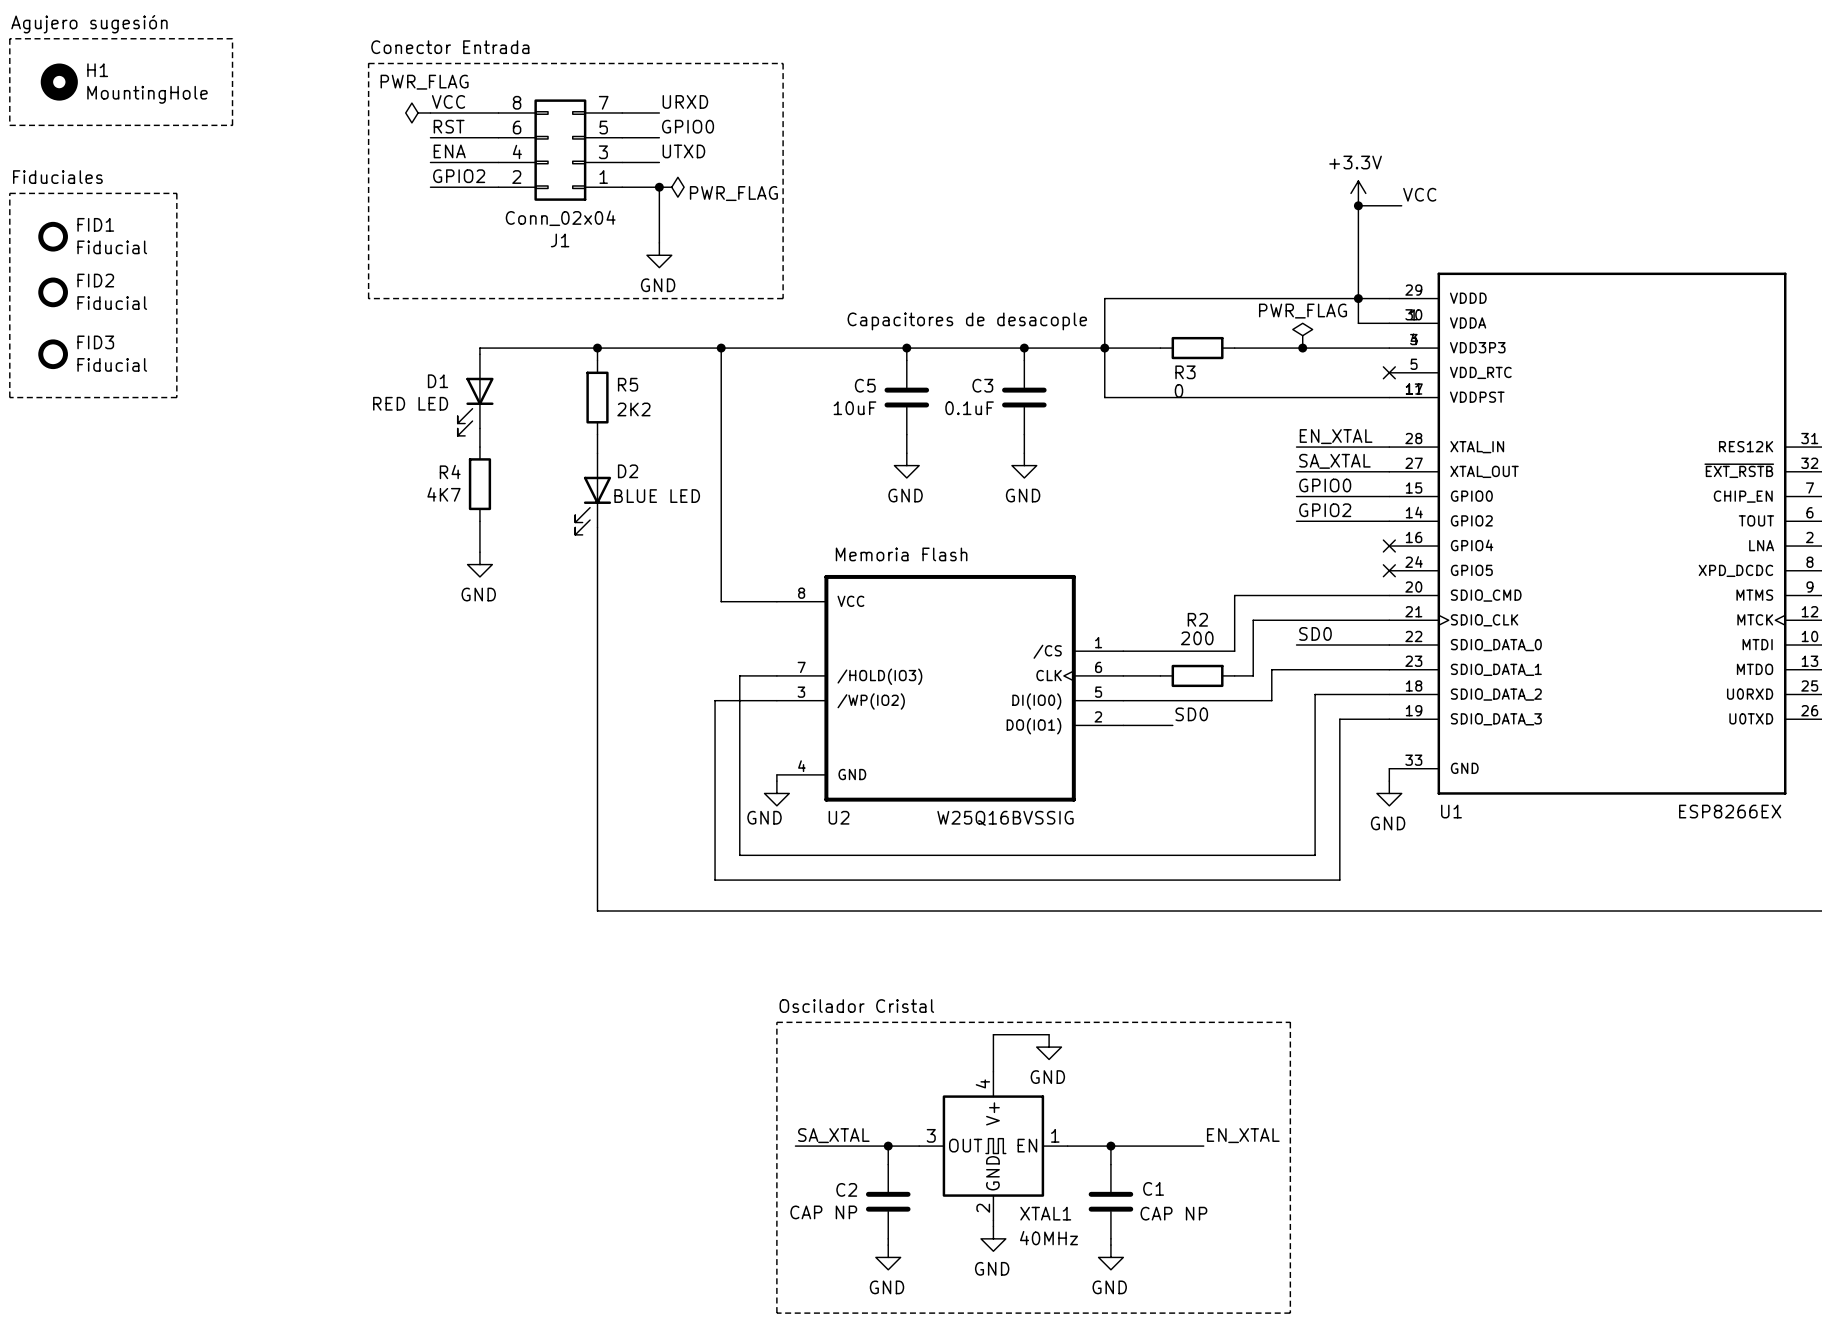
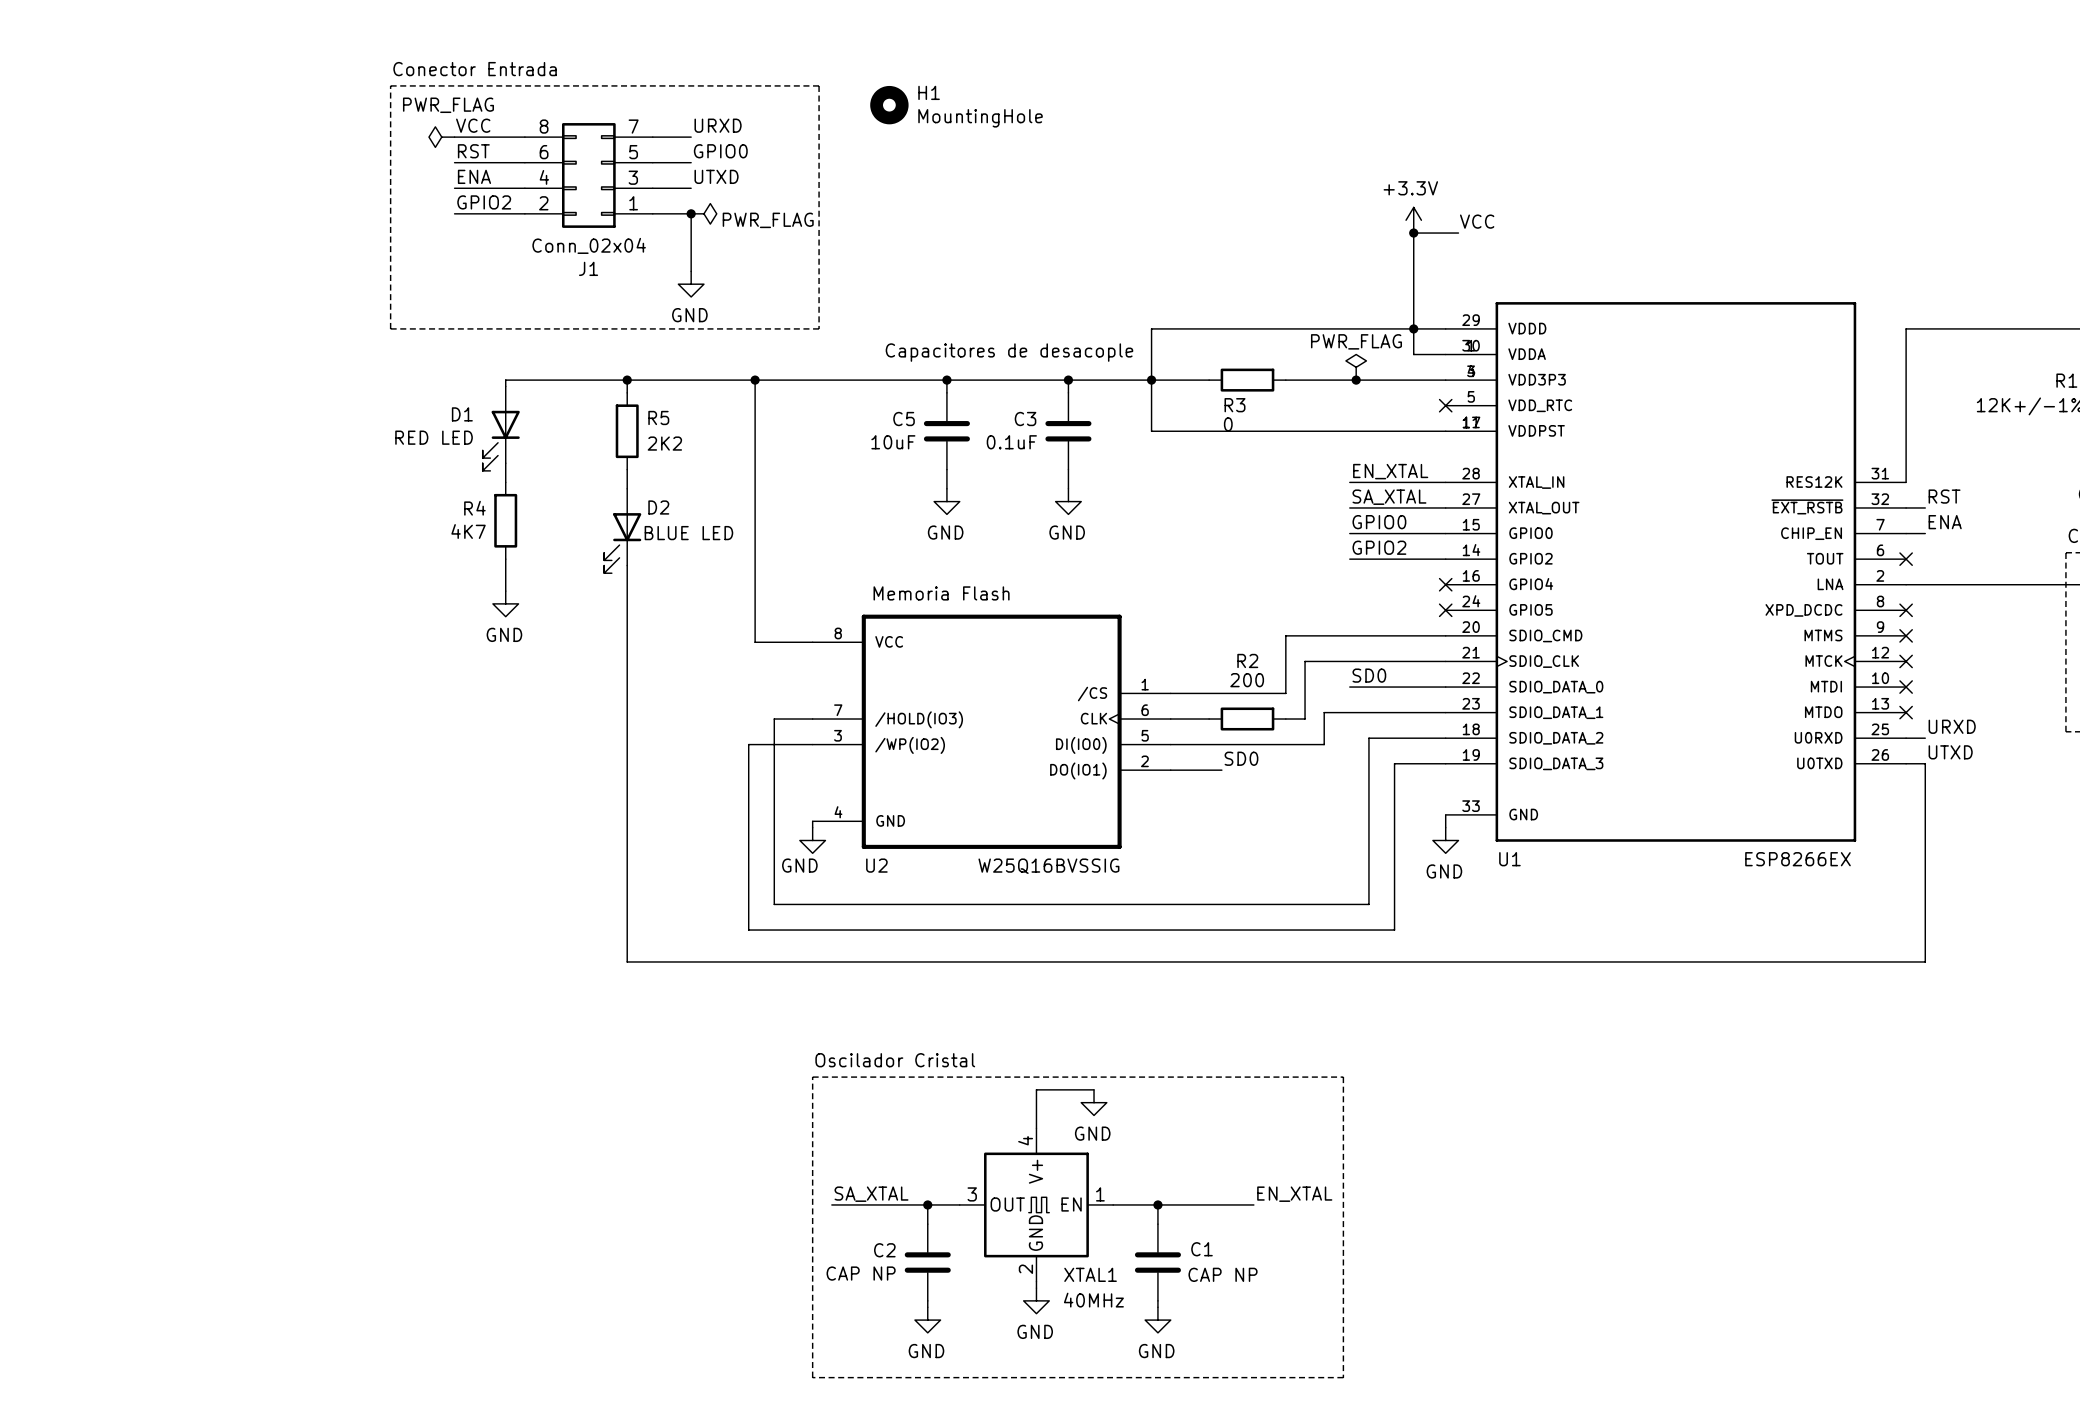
text: Agujero sugesión (89, 24) -> none
line: (9, 38) (9, 125) (232, 125) (232, 38) (9, 38) -> none
H1 position: (59, 82) -> (889, 105)
text: Fiduciales (57, 177) -> none
line: (9, 193) (176, 193) (176, 397) (9, 397) (9, 193) -> none
FID1: Fiducial (53, 236) -> none
FID2: Fiducial (53, 292) -> none
FID3: Fiducial (53, 354) -> none

